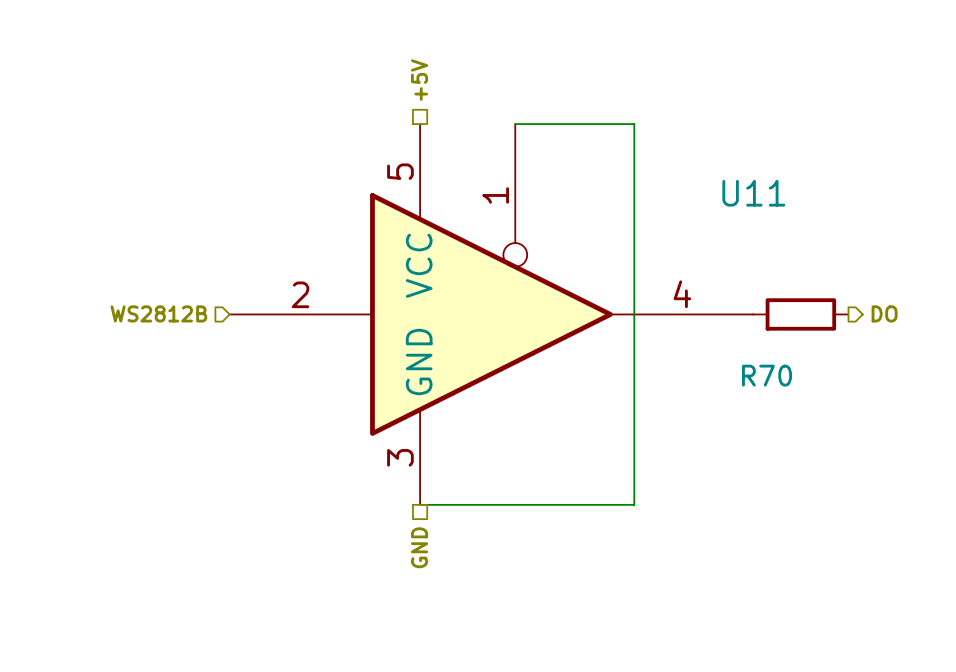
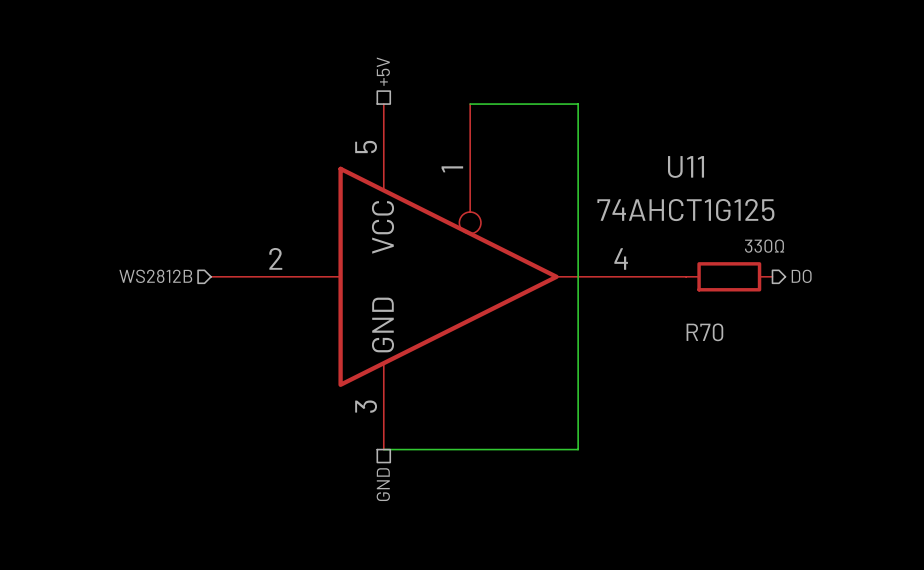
U11 value: none -> 74AHCT1G125 (685, 210)
R70 value: none -> 330Ω (764, 246)

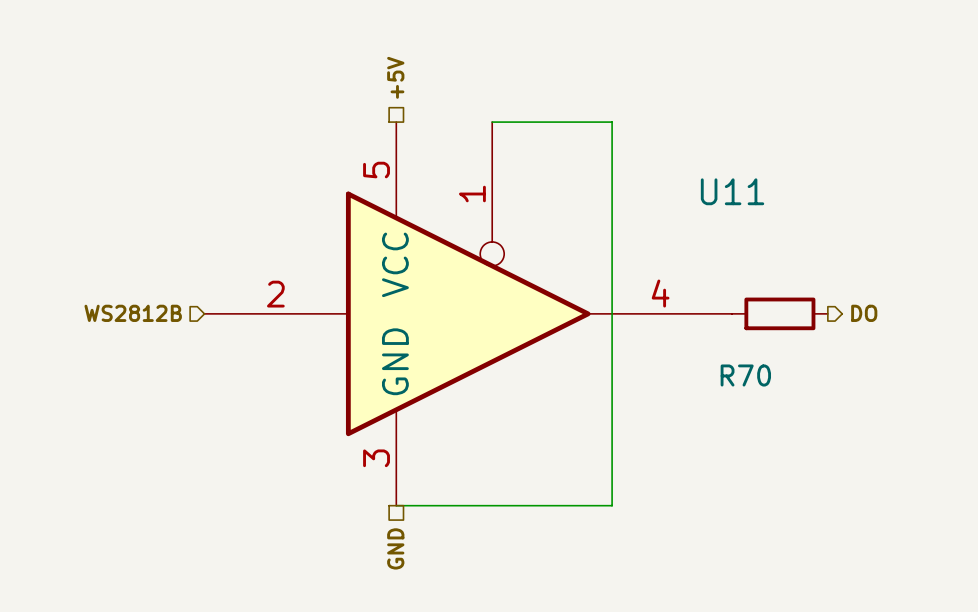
U11 value: 74AHCT1G125 (685, 210) -> none
R70 value: 330Ω (764, 246) -> none

